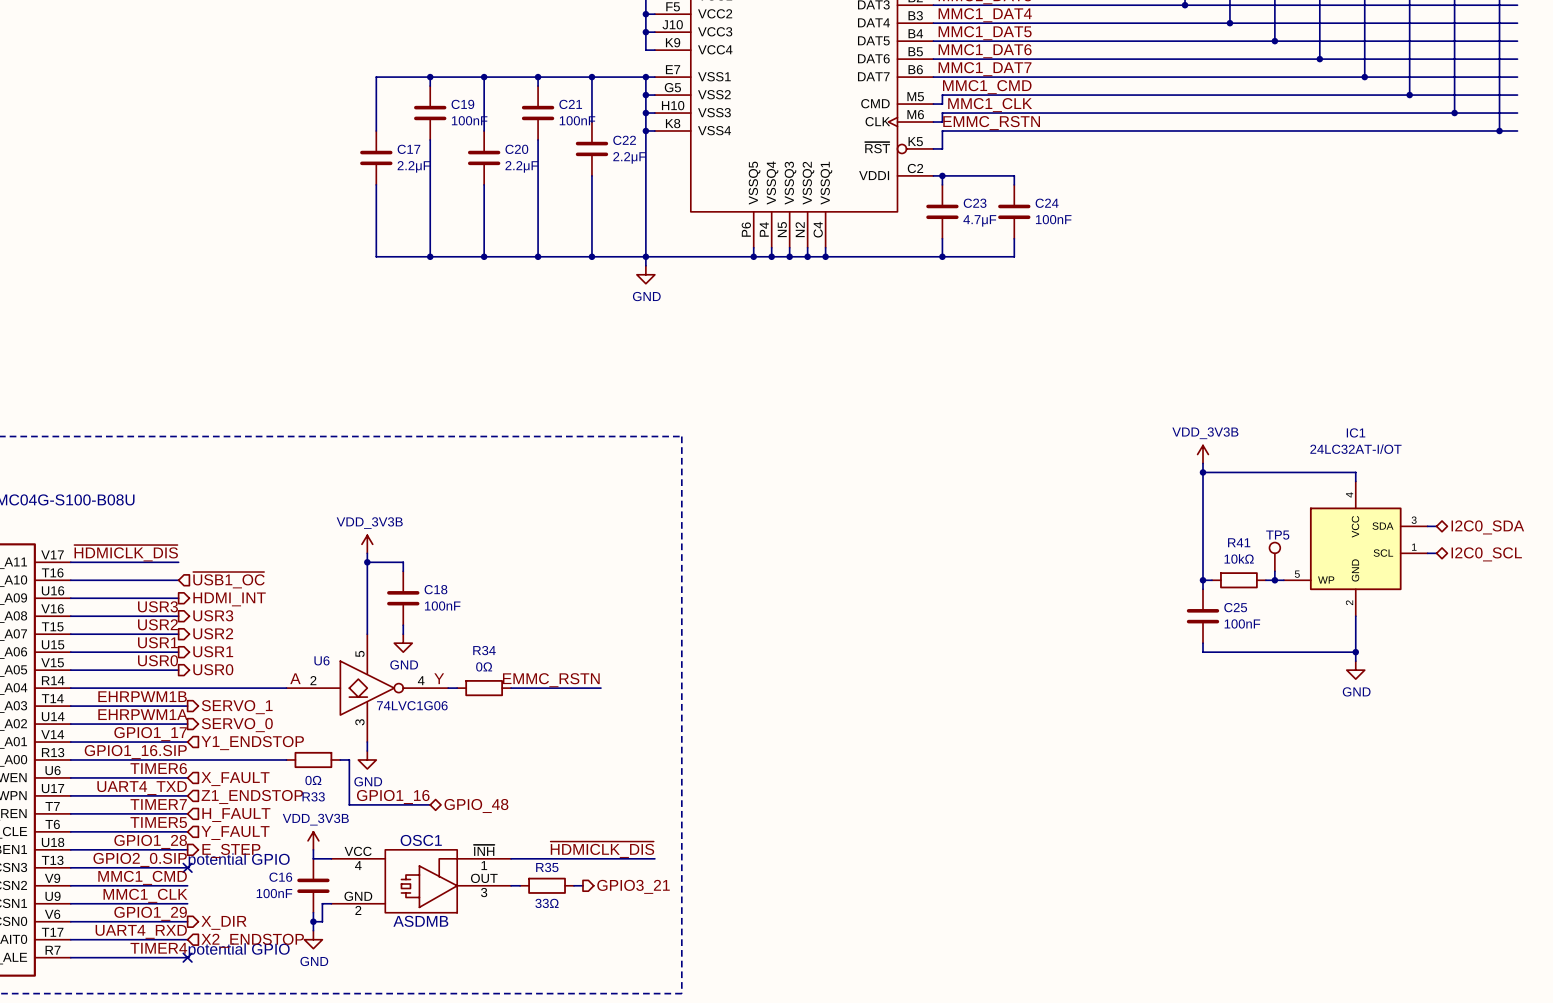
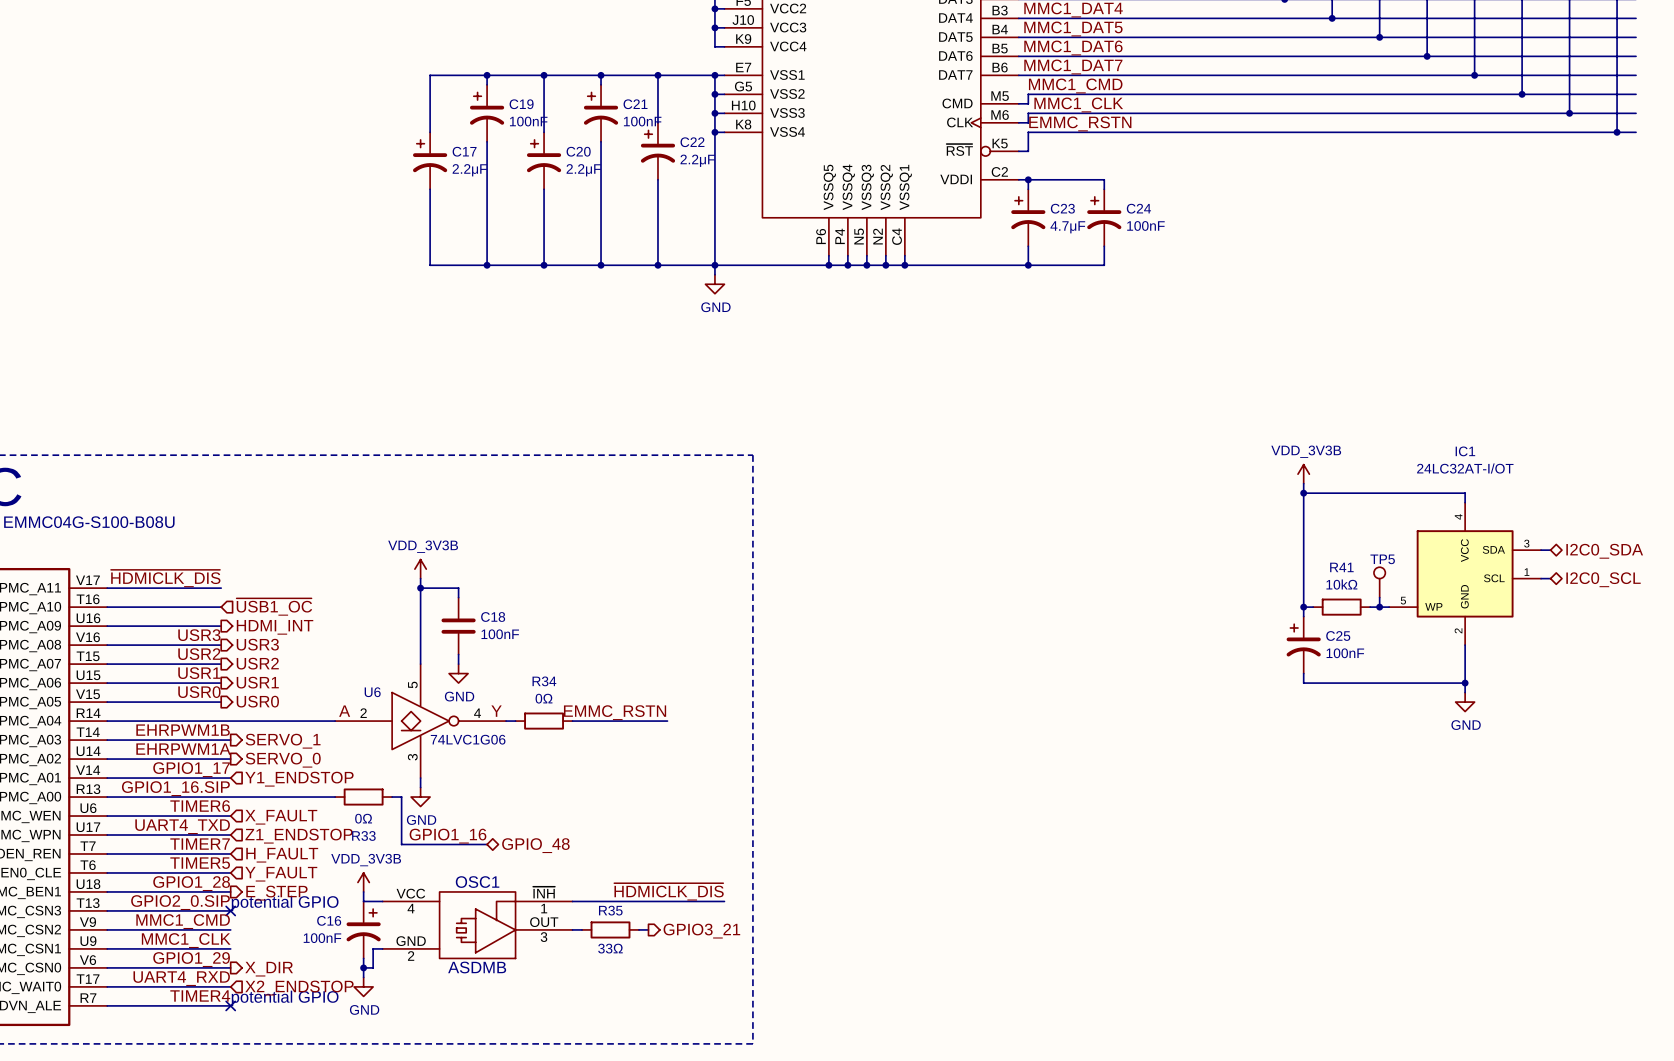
C19 symbol: [414, 86, 447, 140] -> [469, 84, 505, 142]
C21 symbol: [521, 86, 555, 140] -> [583, 84, 619, 142]
C22 symbol: [575, 122, 609, 176] -> [640, 122, 676, 180]
C17 symbol: [360, 130, 393, 185] -> [412, 132, 448, 190]
C20 symbol: [467, 130, 501, 185] -> [526, 132, 562, 190]
C23 symbol: [926, 184, 959, 239] -> [1011, 189, 1046, 247]
C24 symbol: [998, 184, 1031, 239] -> [1087, 189, 1122, 247]
C25 symbol: [1186, 589, 1220, 644] -> [1286, 616, 1321, 674]
C16 symbol: [297, 858, 330, 913] -> [346, 901, 381, 959]

